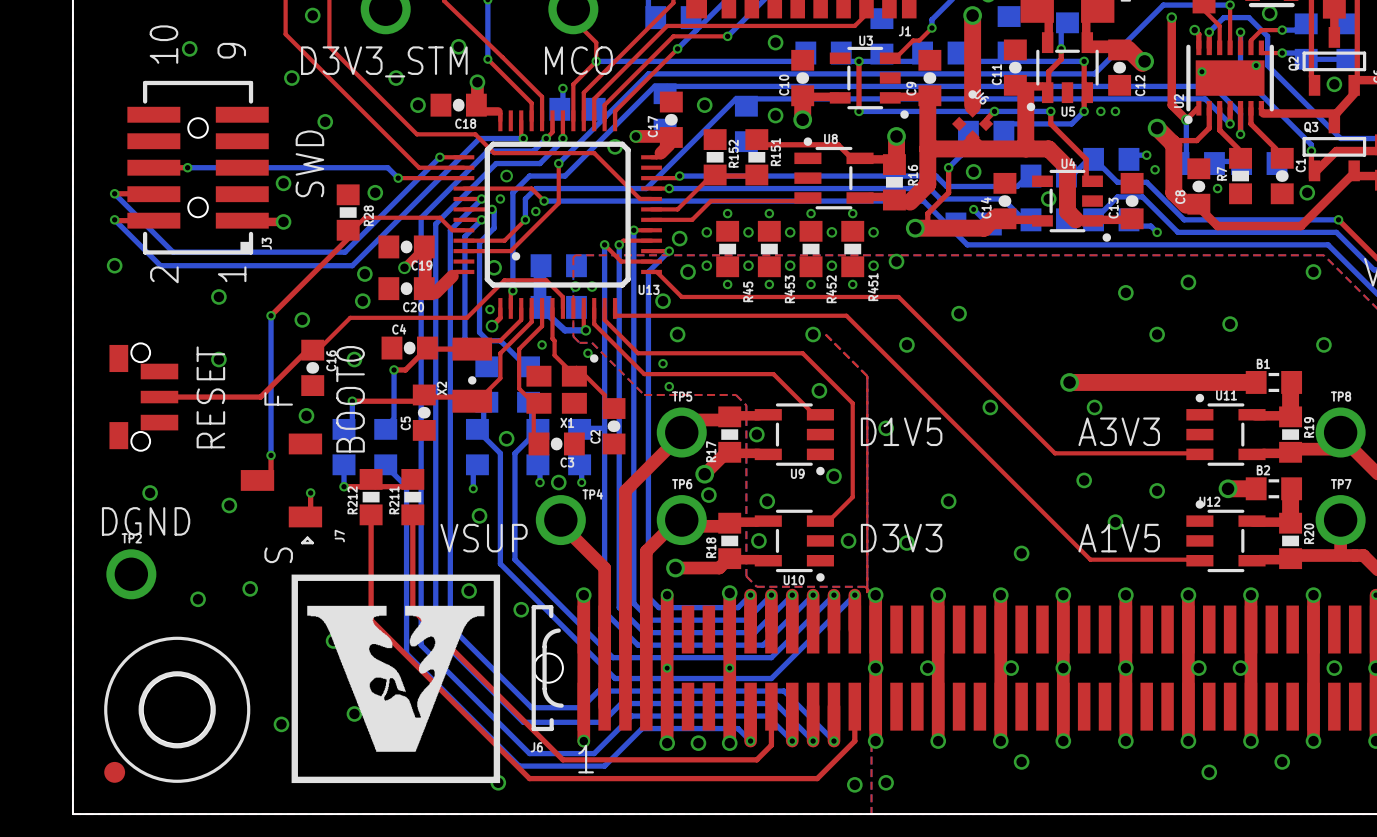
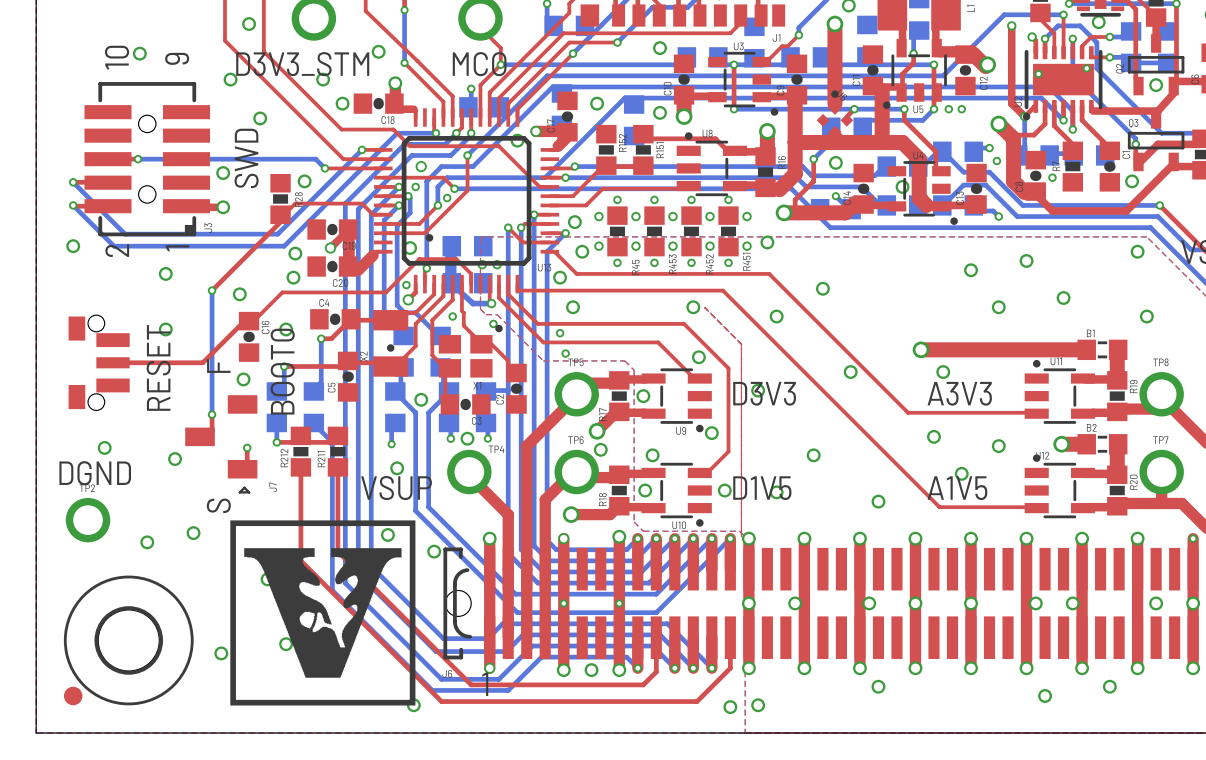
text: D1V5 (901, 431) -> D3V3 (764, 393)
text: D3V3 (901, 538) -> D1V5 (762, 488)

